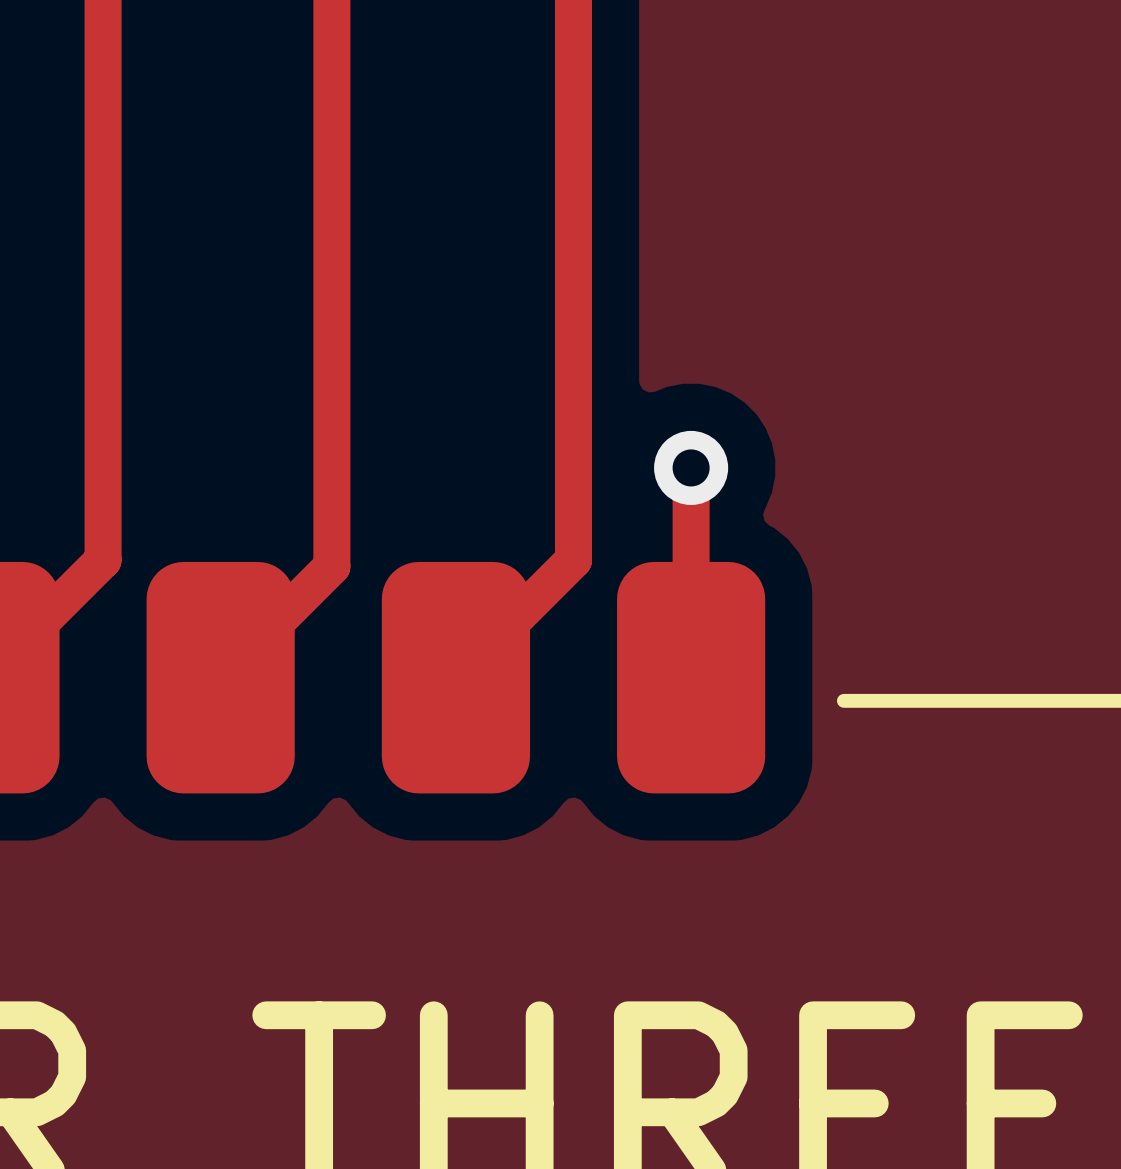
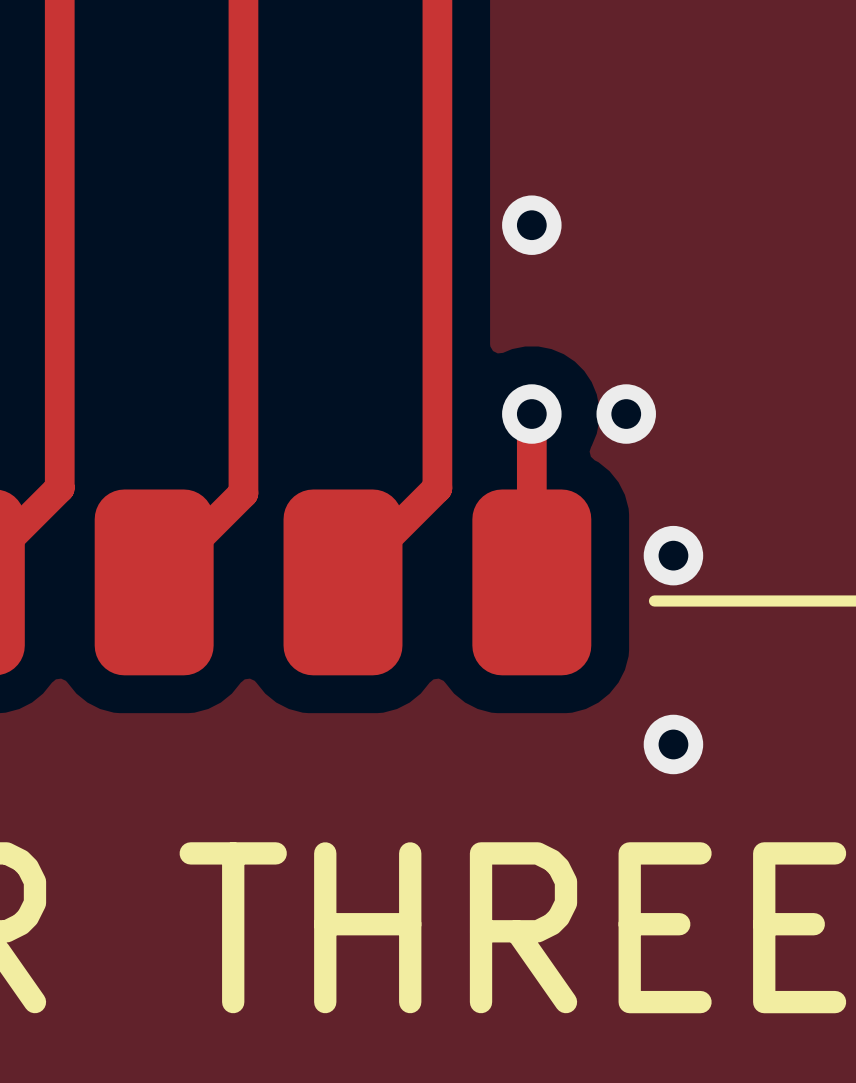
via: none -> (531, 225)
via: none -> (626, 414)
via: none -> (673, 555)
via: none -> (673, 744)

